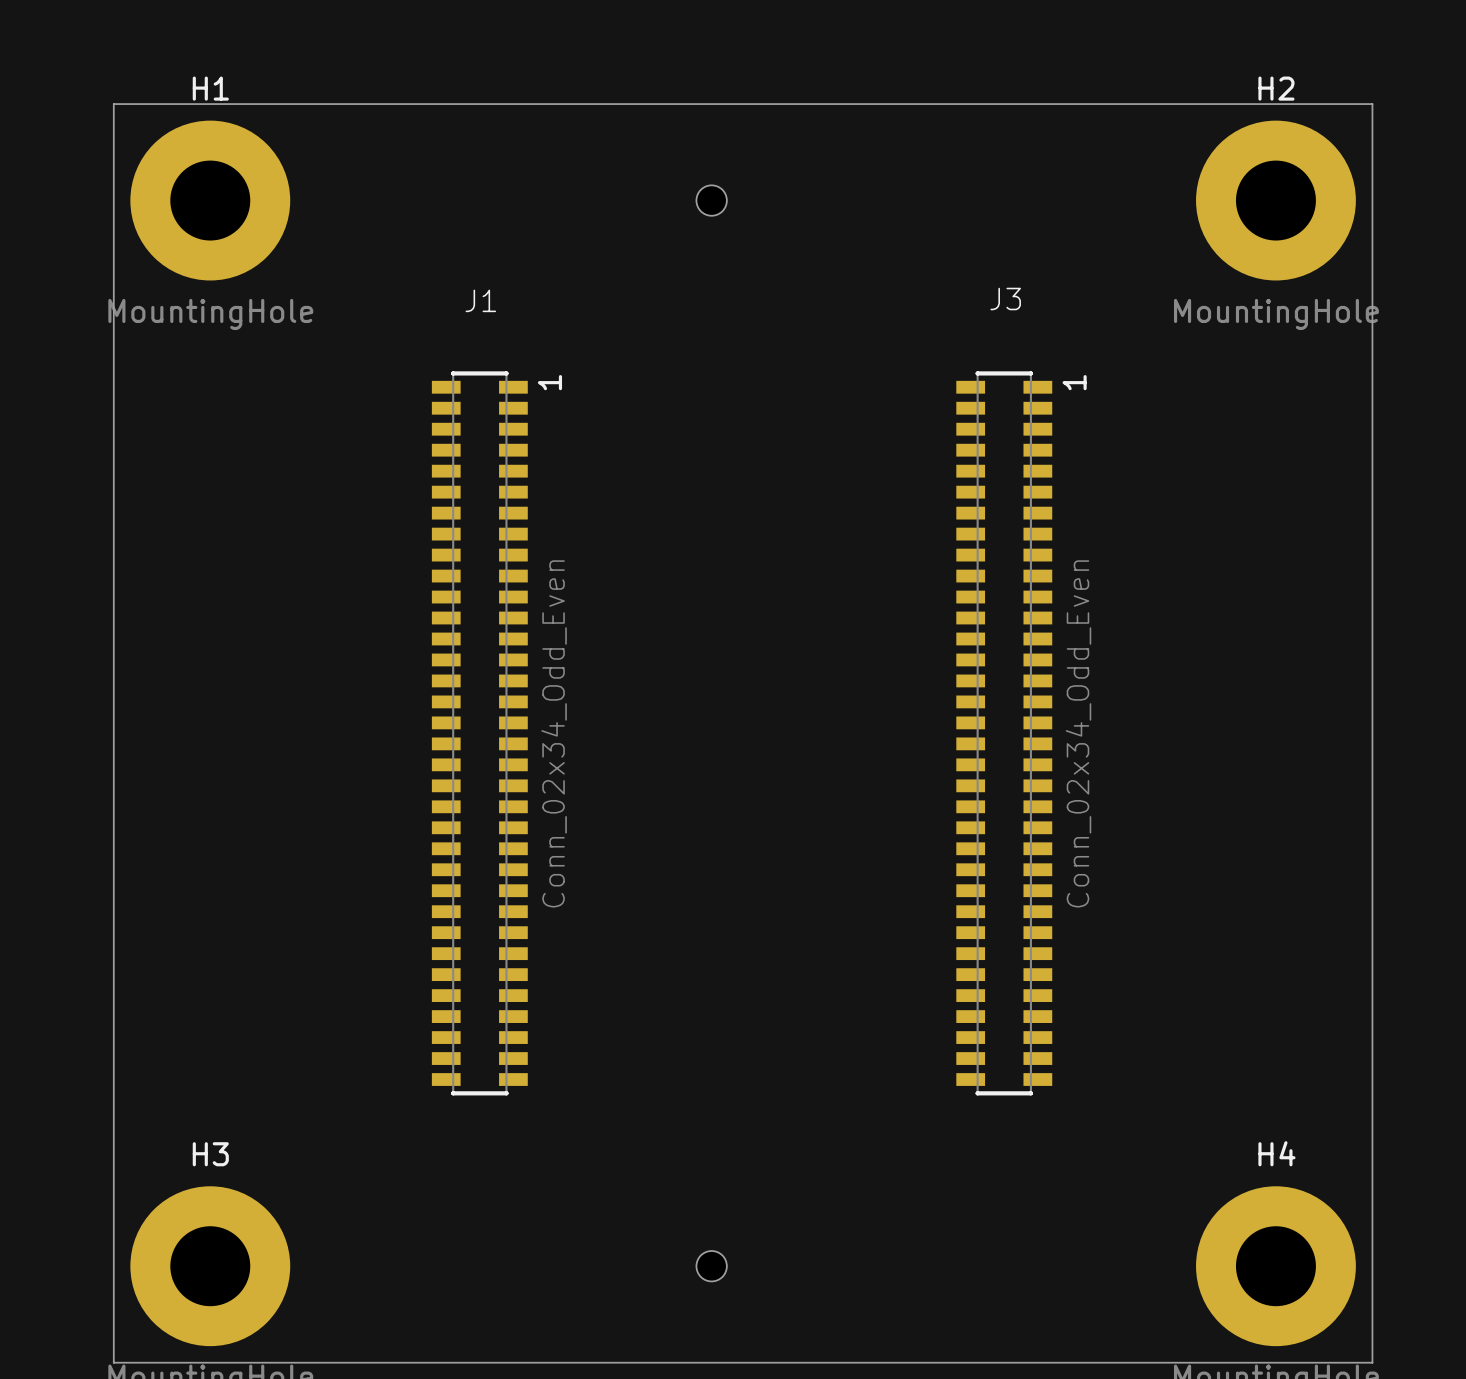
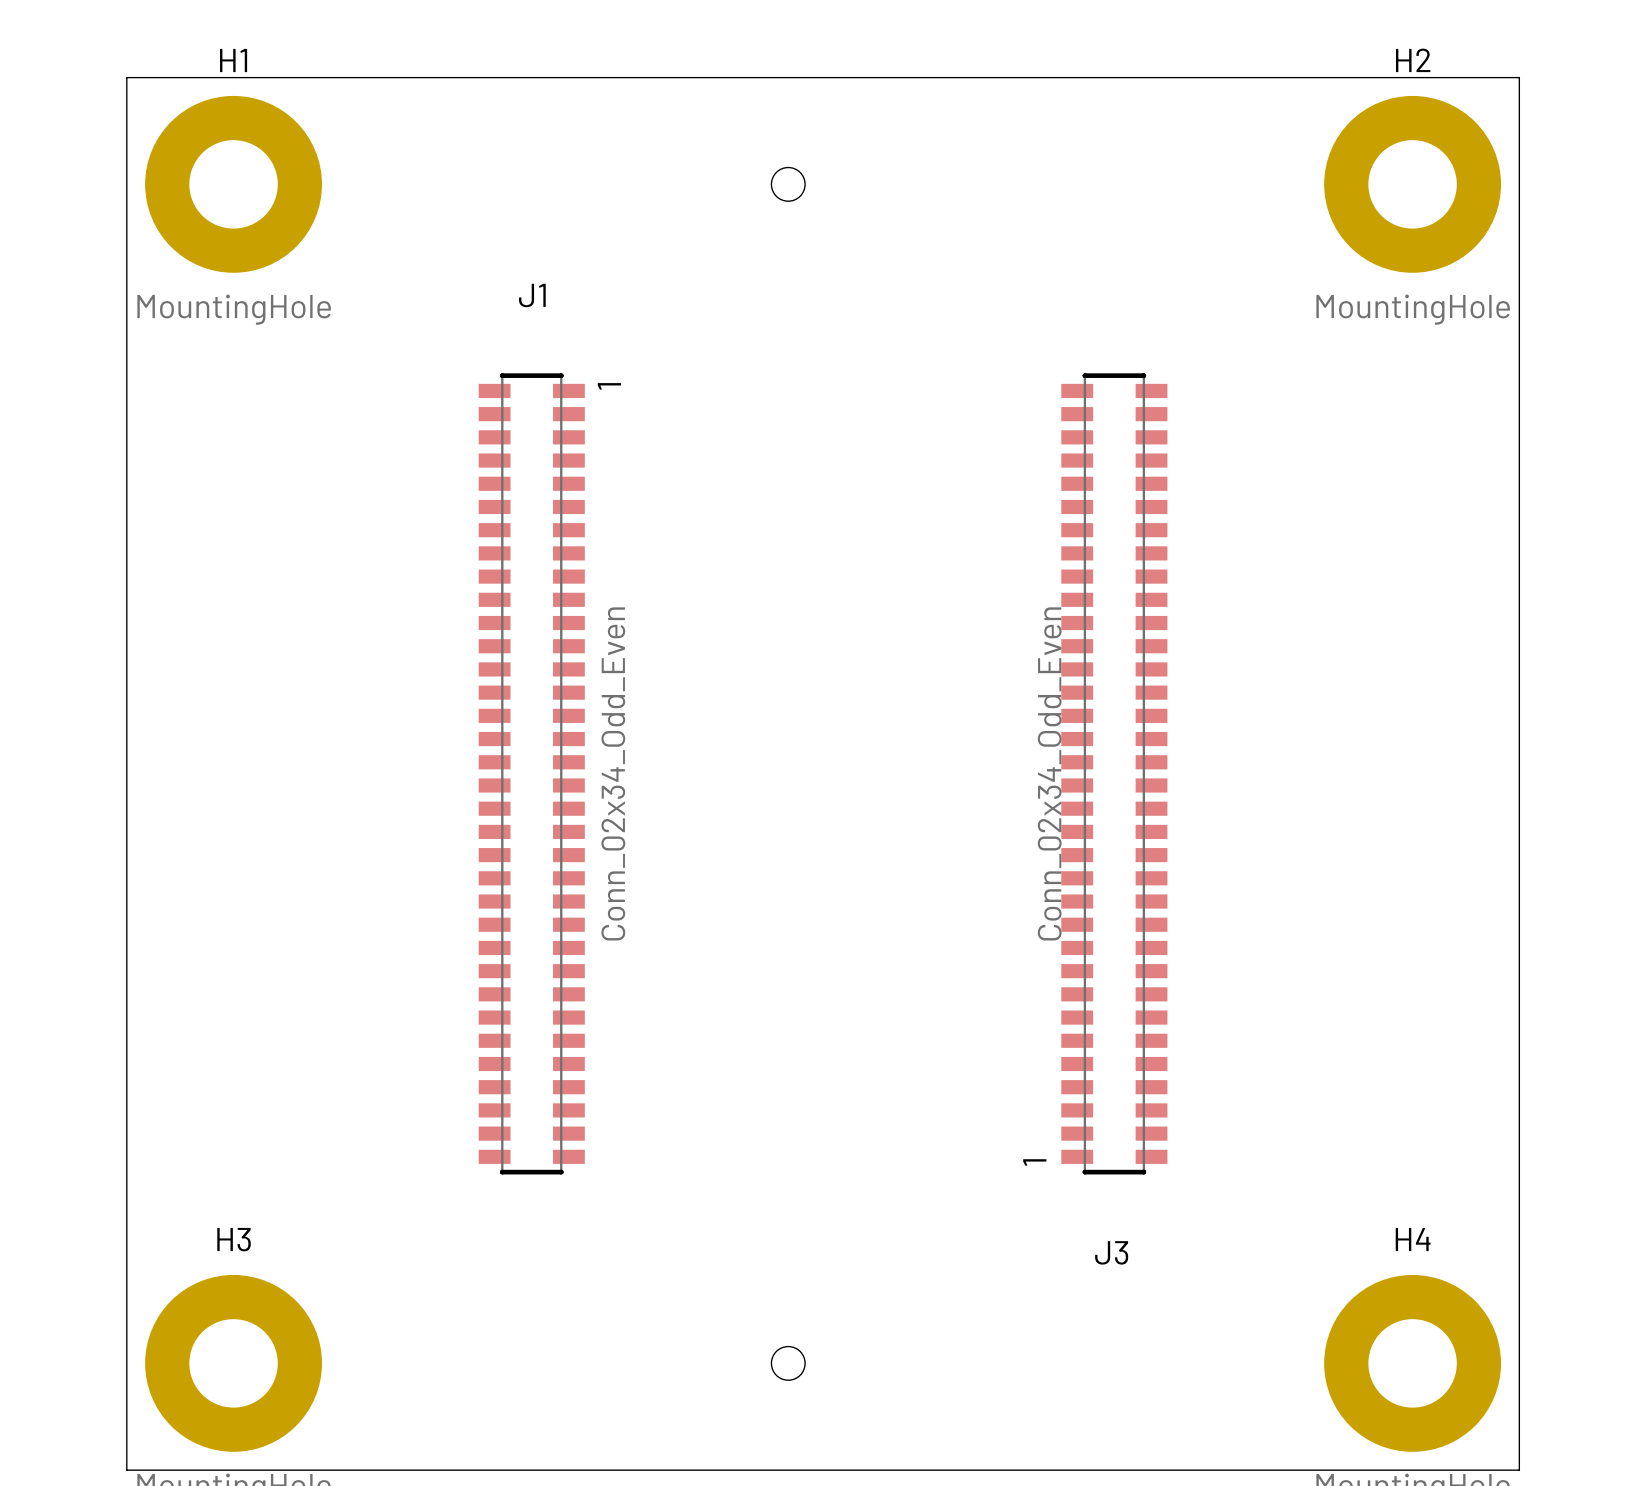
J3 rotation: 0° (1004, 733) -> 180° (1114, 773)

